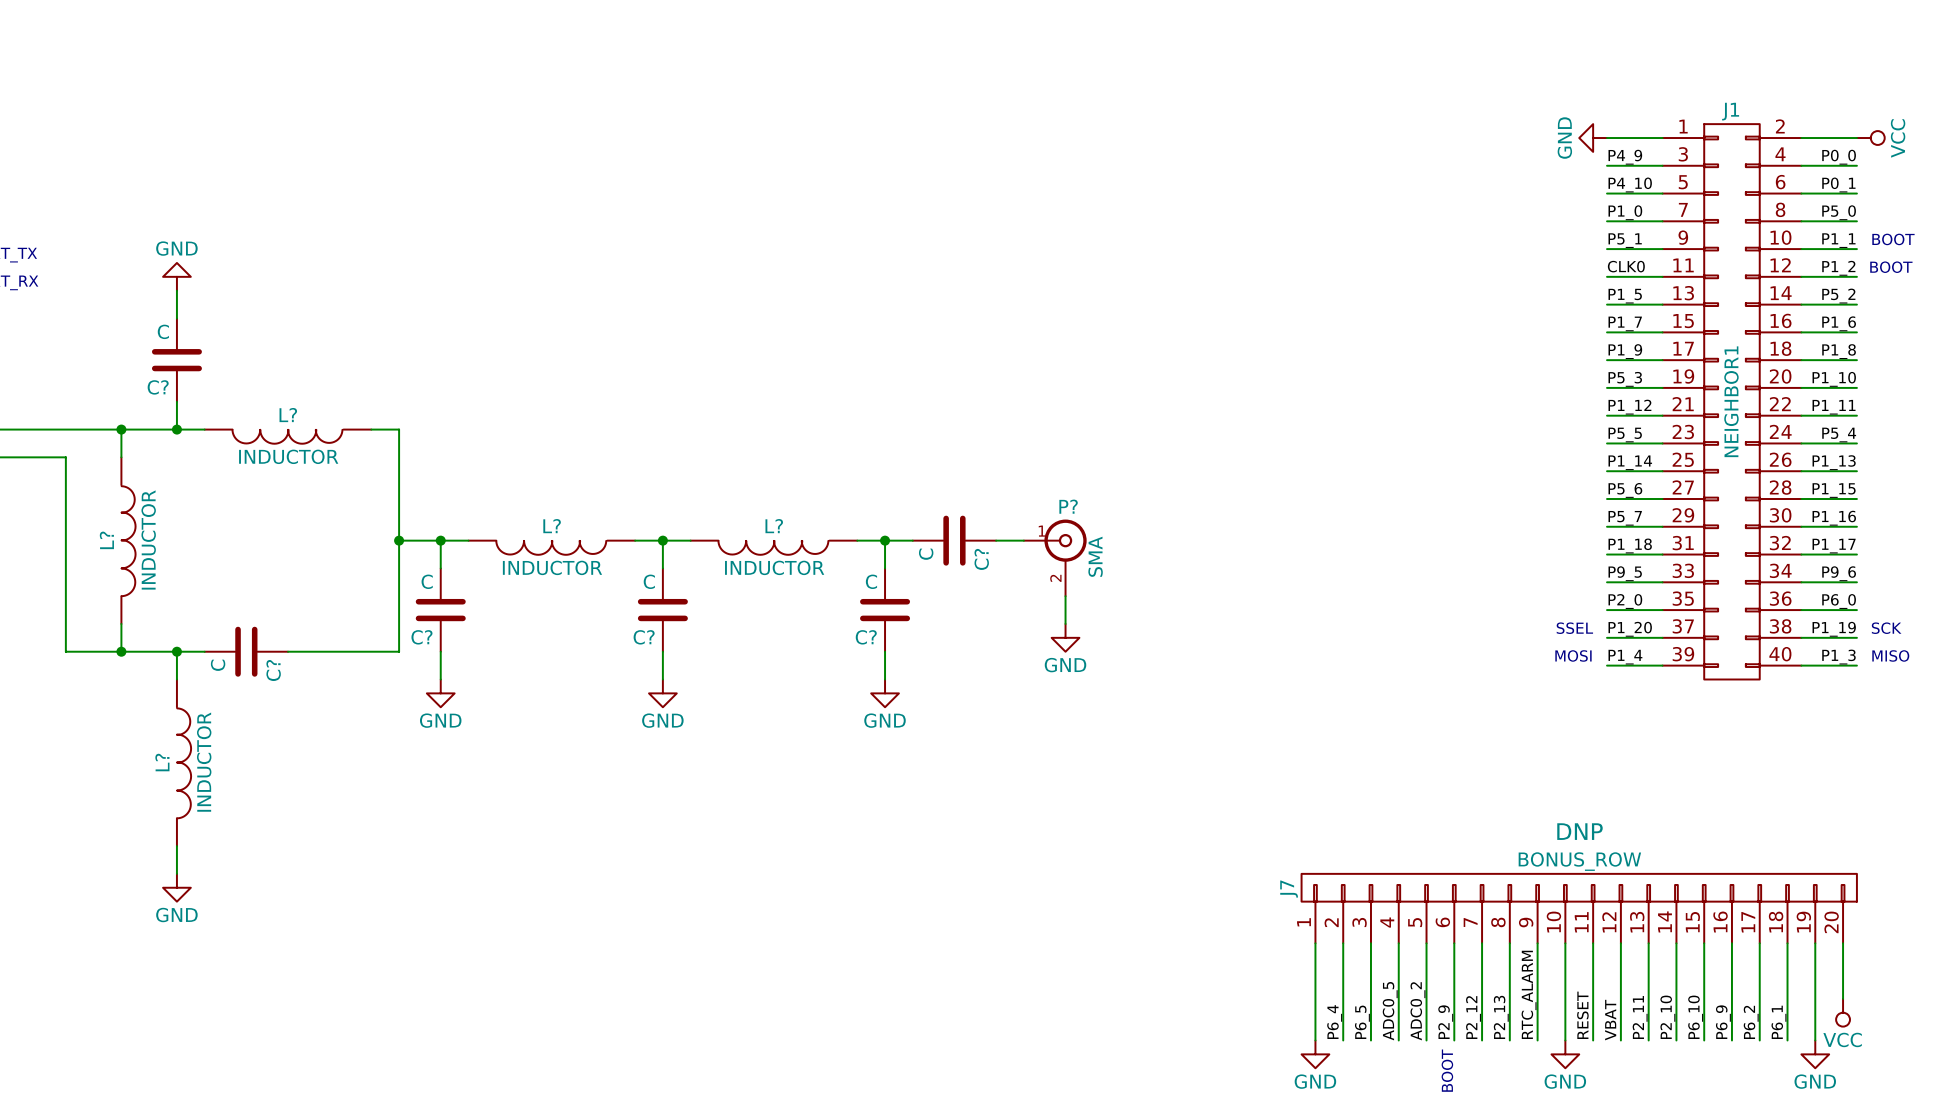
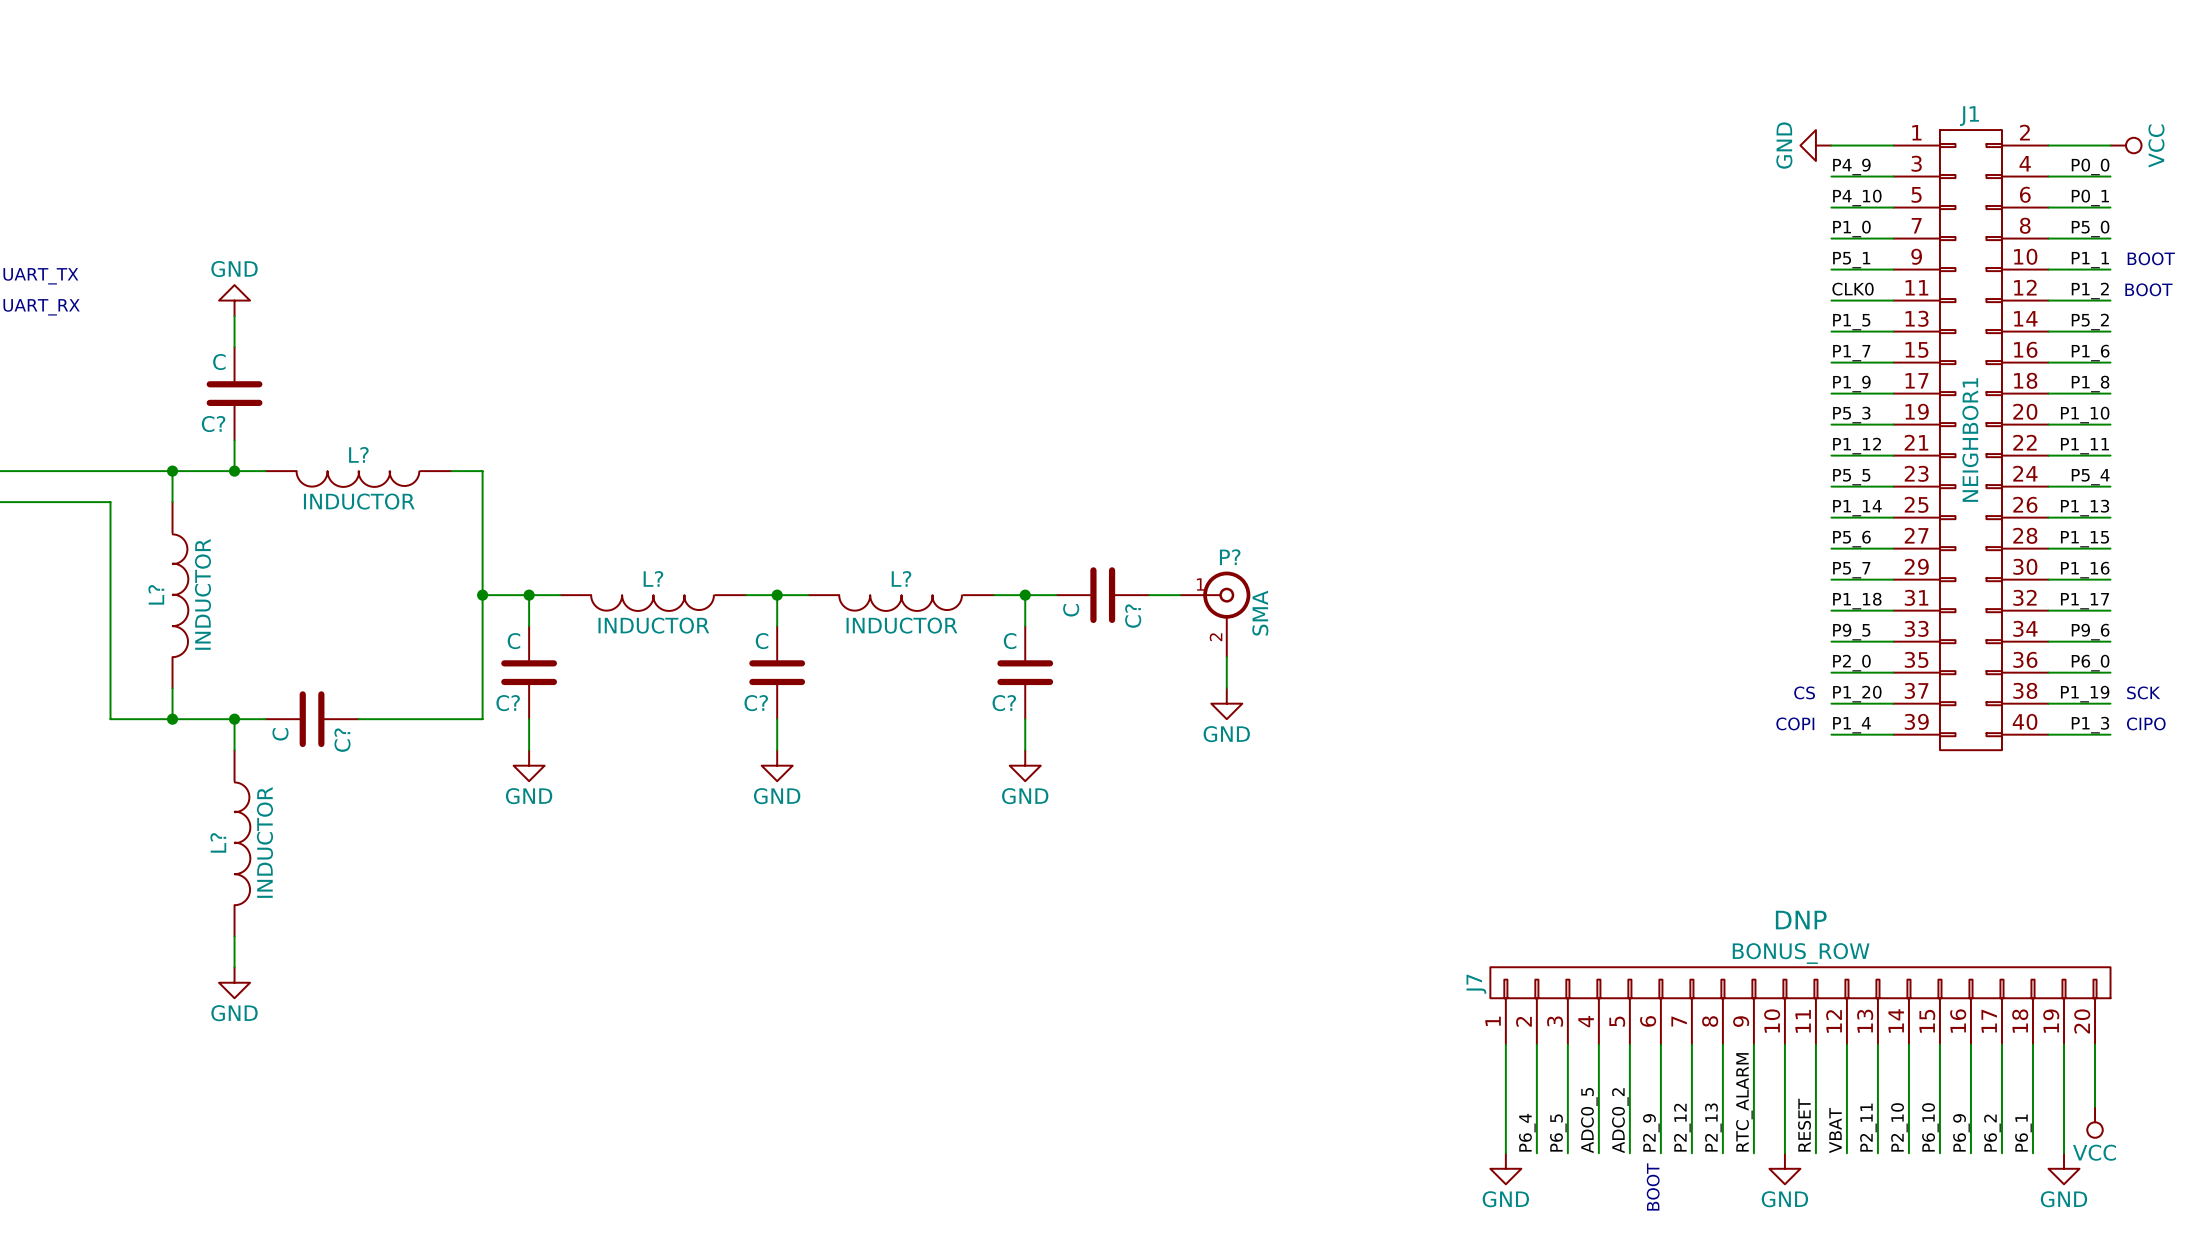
text: SSEL (1574, 628) -> CS (1804, 692)
text: MOSI (1573, 655) -> COPI (1795, 723)
text: MISO (1890, 655) -> CIPO (2146, 723)

